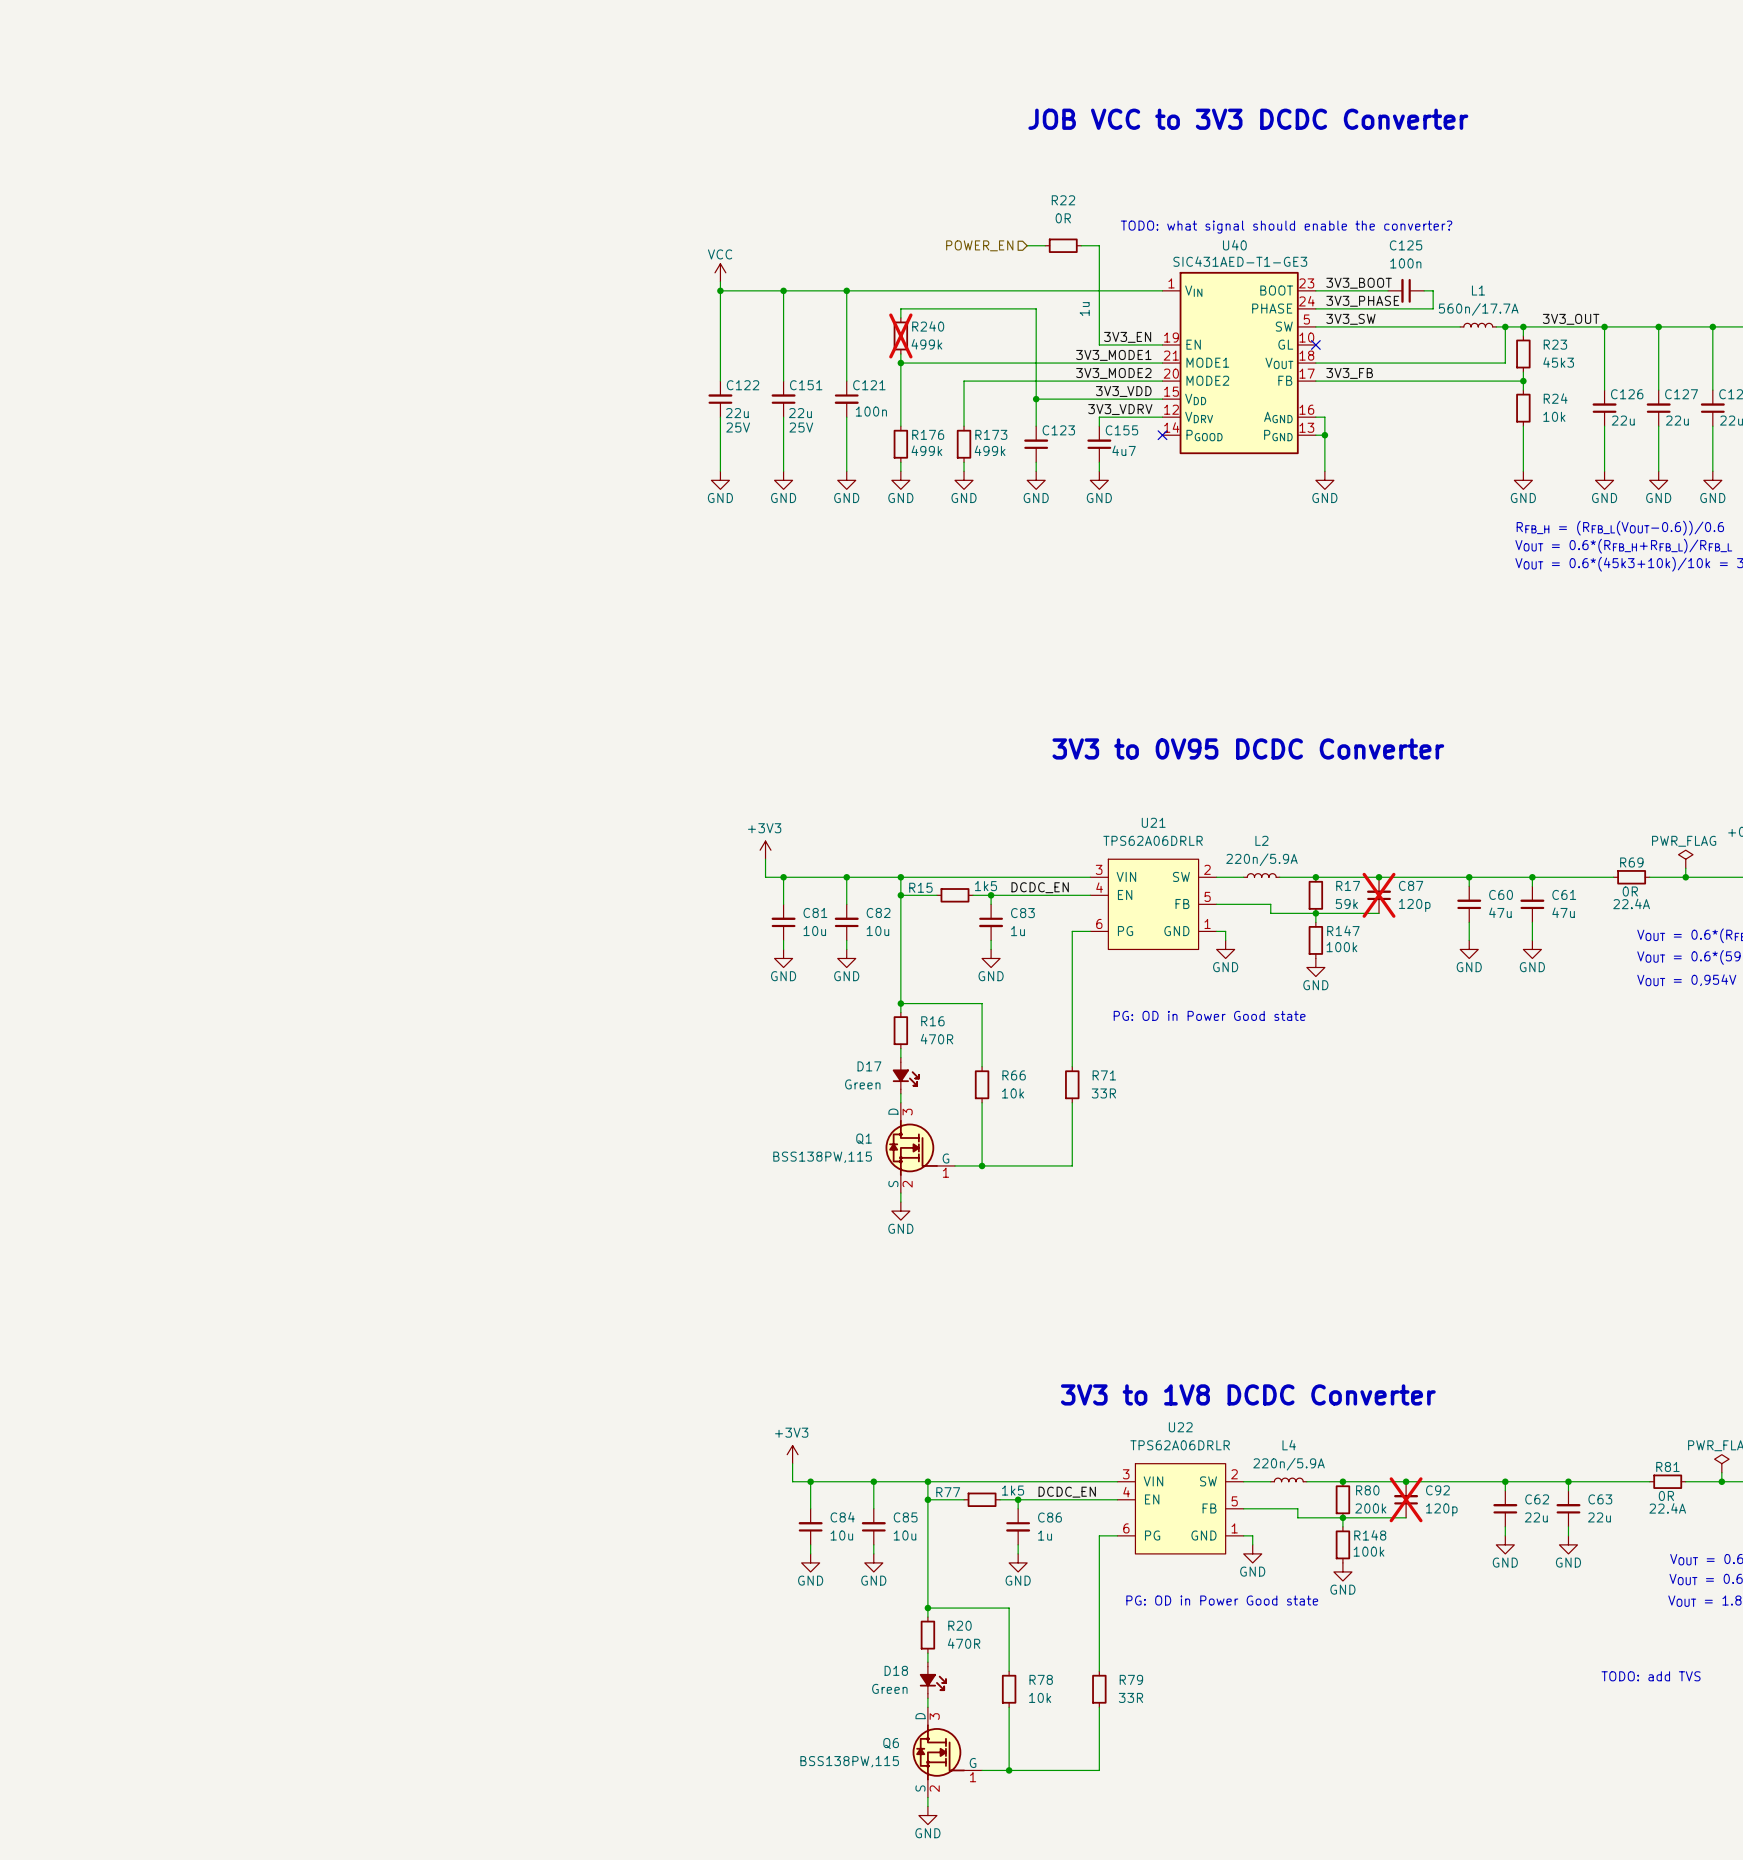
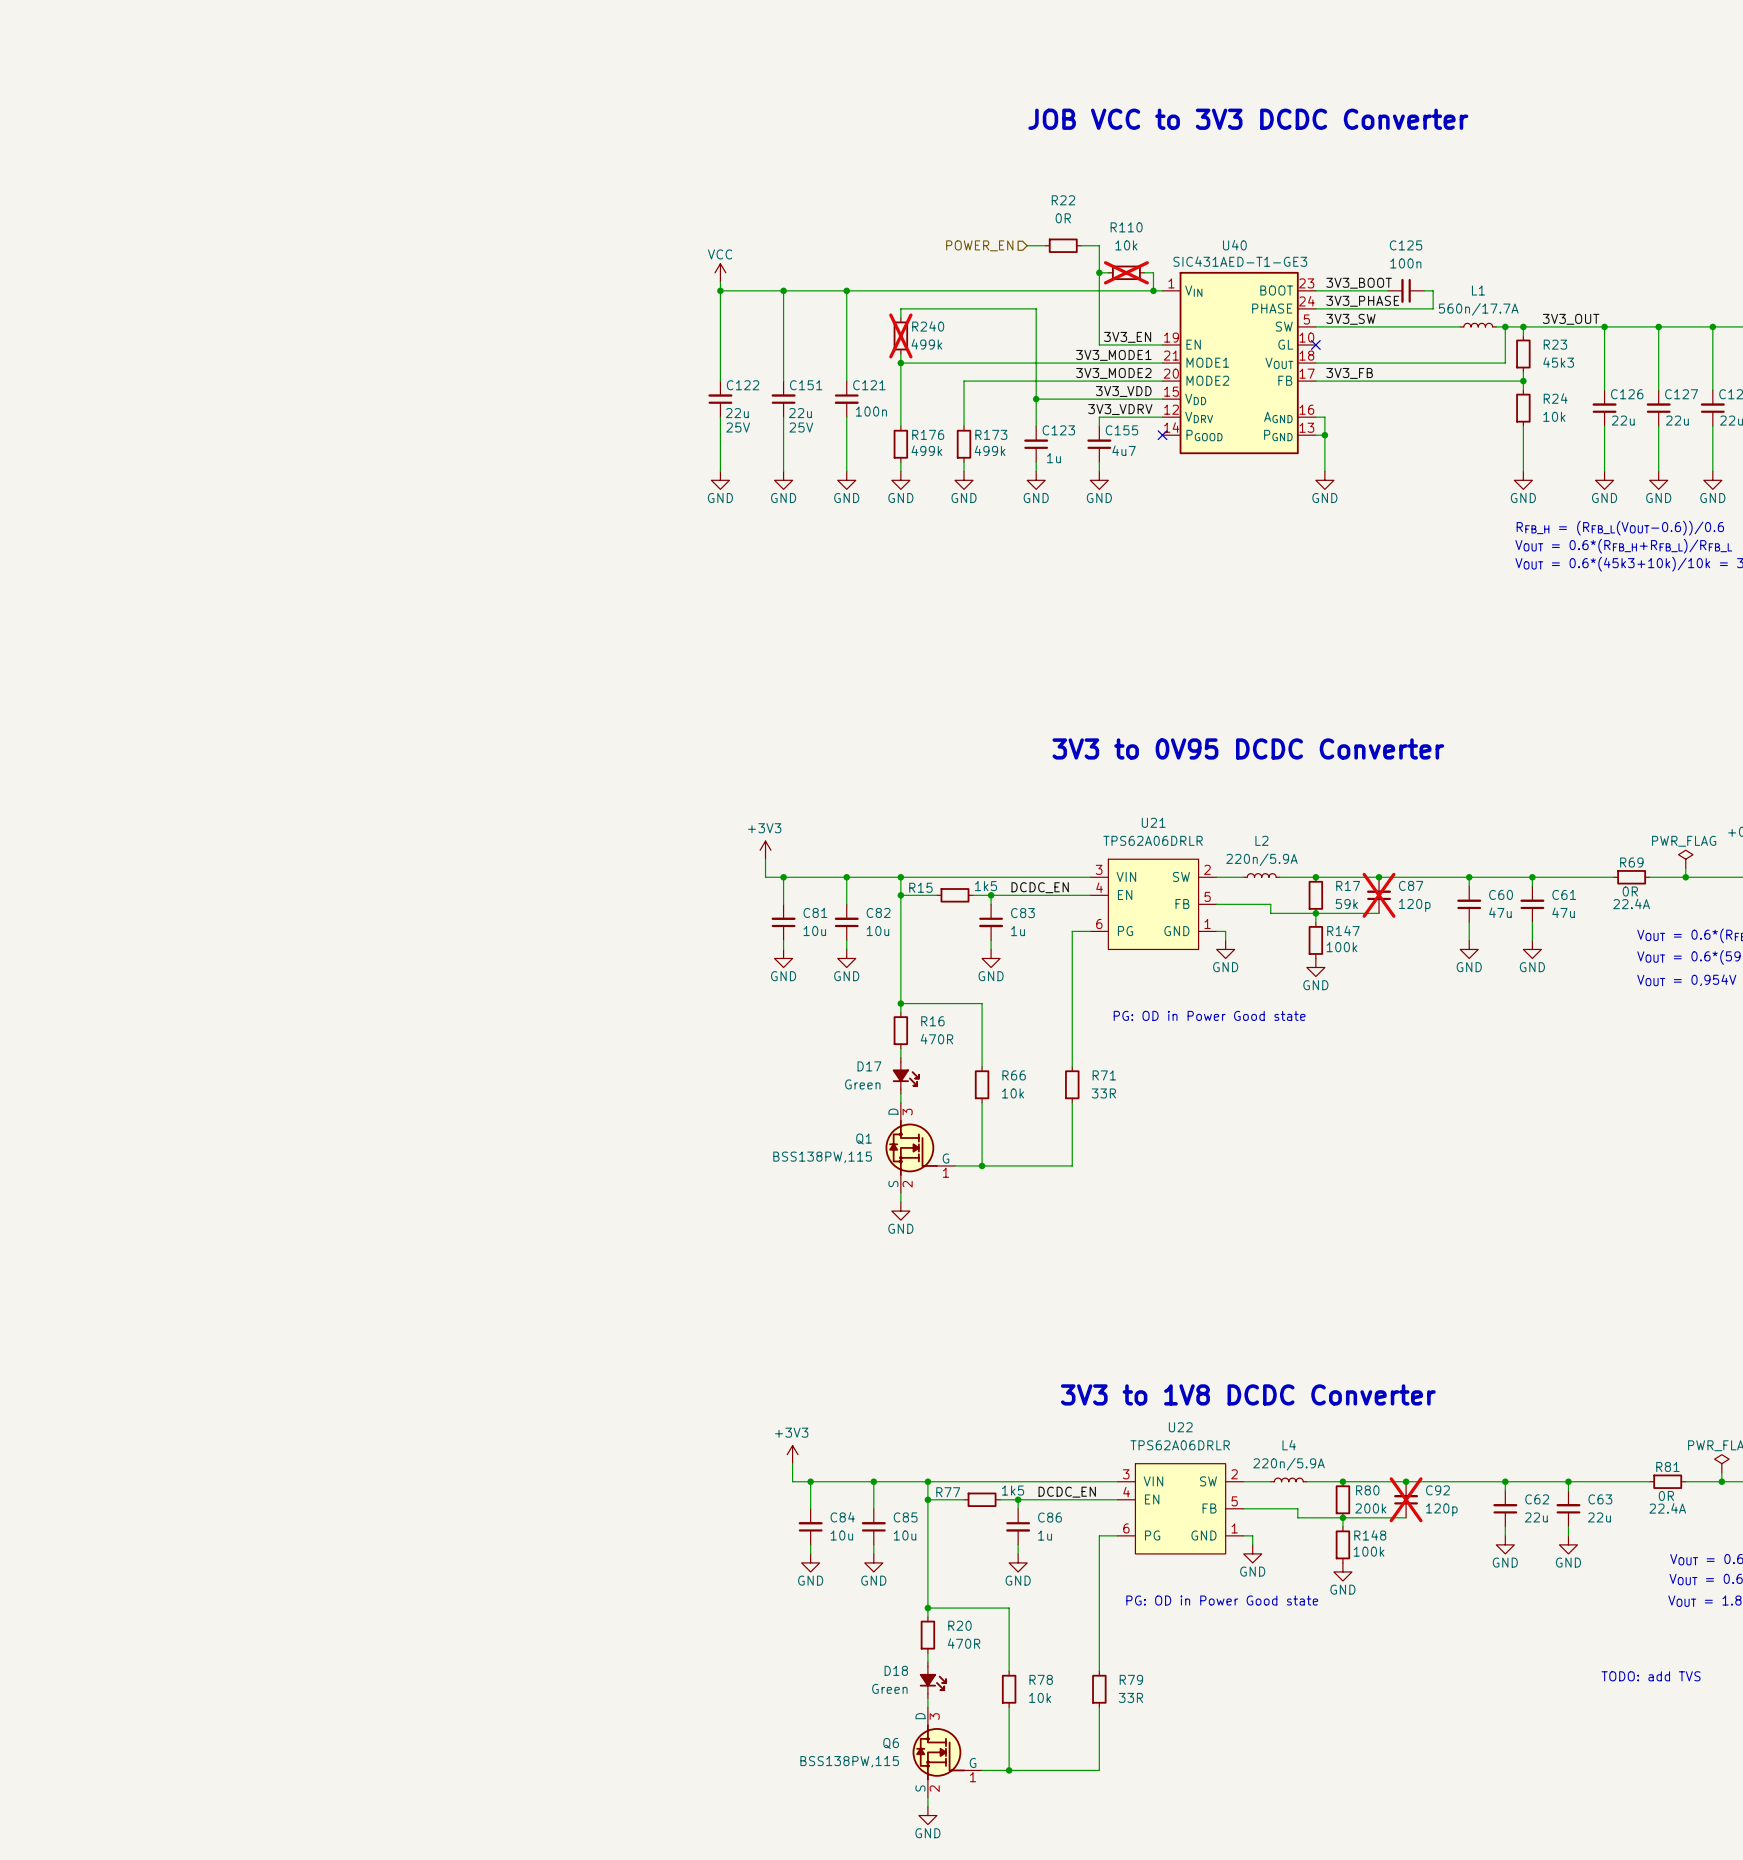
text: TODO: what signal should enable the converter? (1286, 227) -> none
wire: none -> (1099, 272) (1108, 272)
junction: none -> (1099, 272)
R110: none -> (1126, 272)
wire: none -> (1144, 272) (1153, 272) (1153, 290)
junction: none -> (1153, 290)
C123 text rotation: 0° (1084, 309) -> 90° clockwise (1053, 458)
C123 text position: 1u (1084, 309) -> 1u (1053, 458)

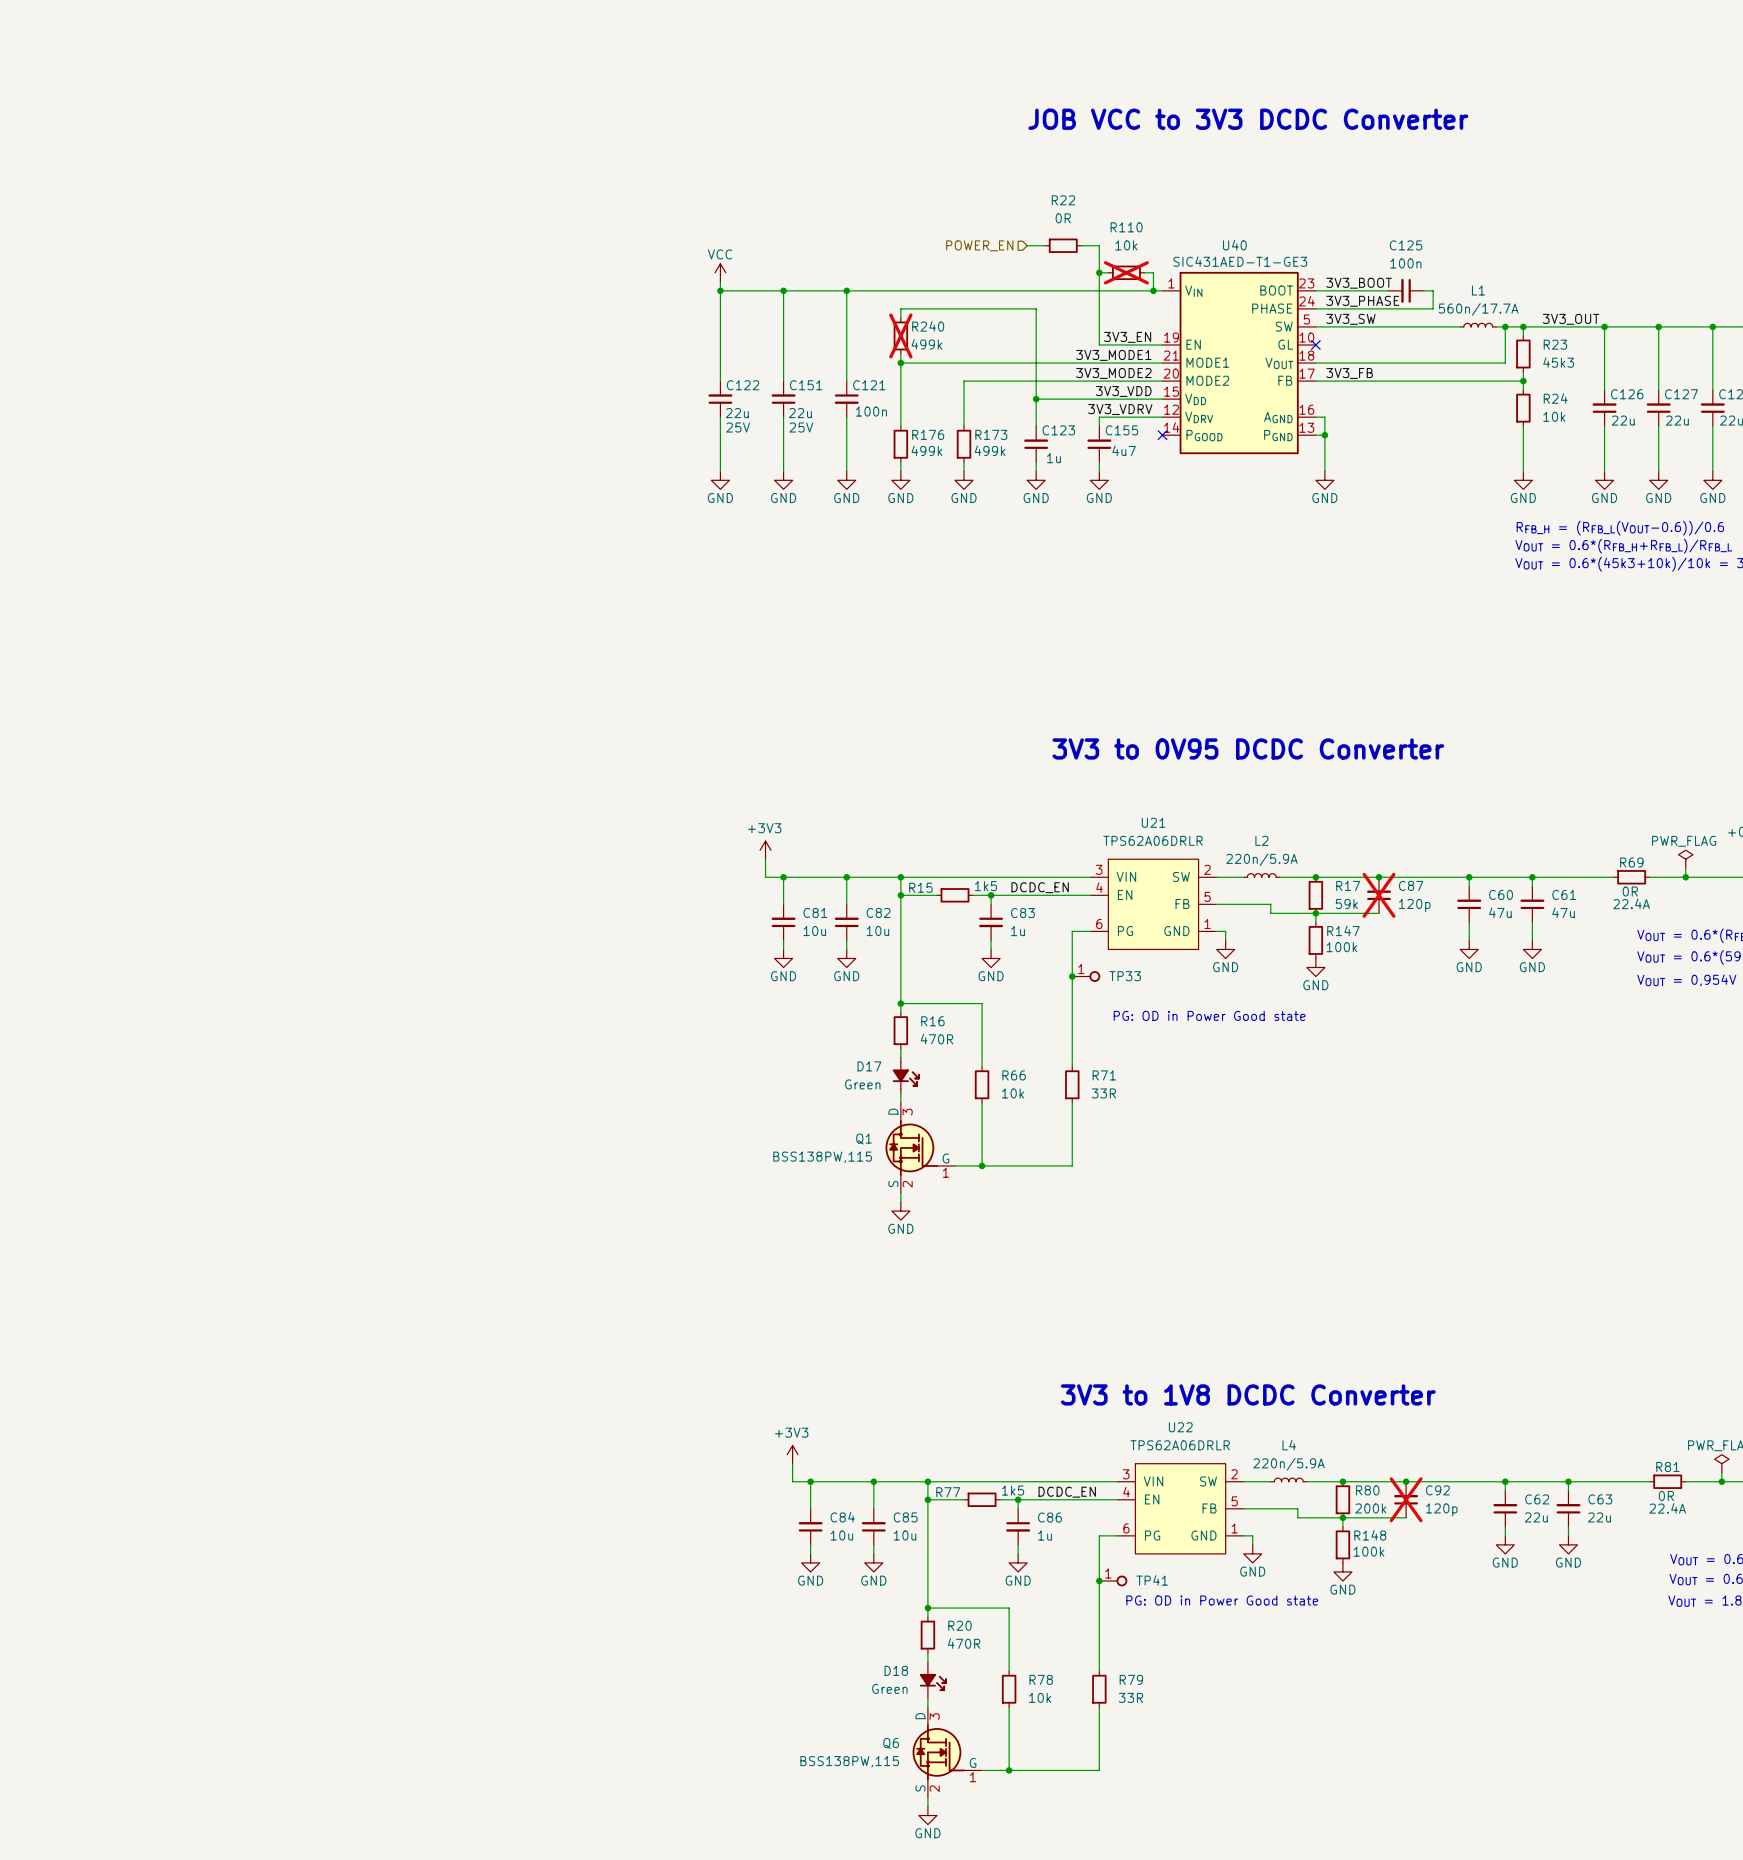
junction: none -> (1072, 976)
TP33: none -> (1086, 976)
junction: none -> (1099, 1580)
TP41: none -> (1113, 1580)
text: TODO: add TVS (1651, 1676) -> none

